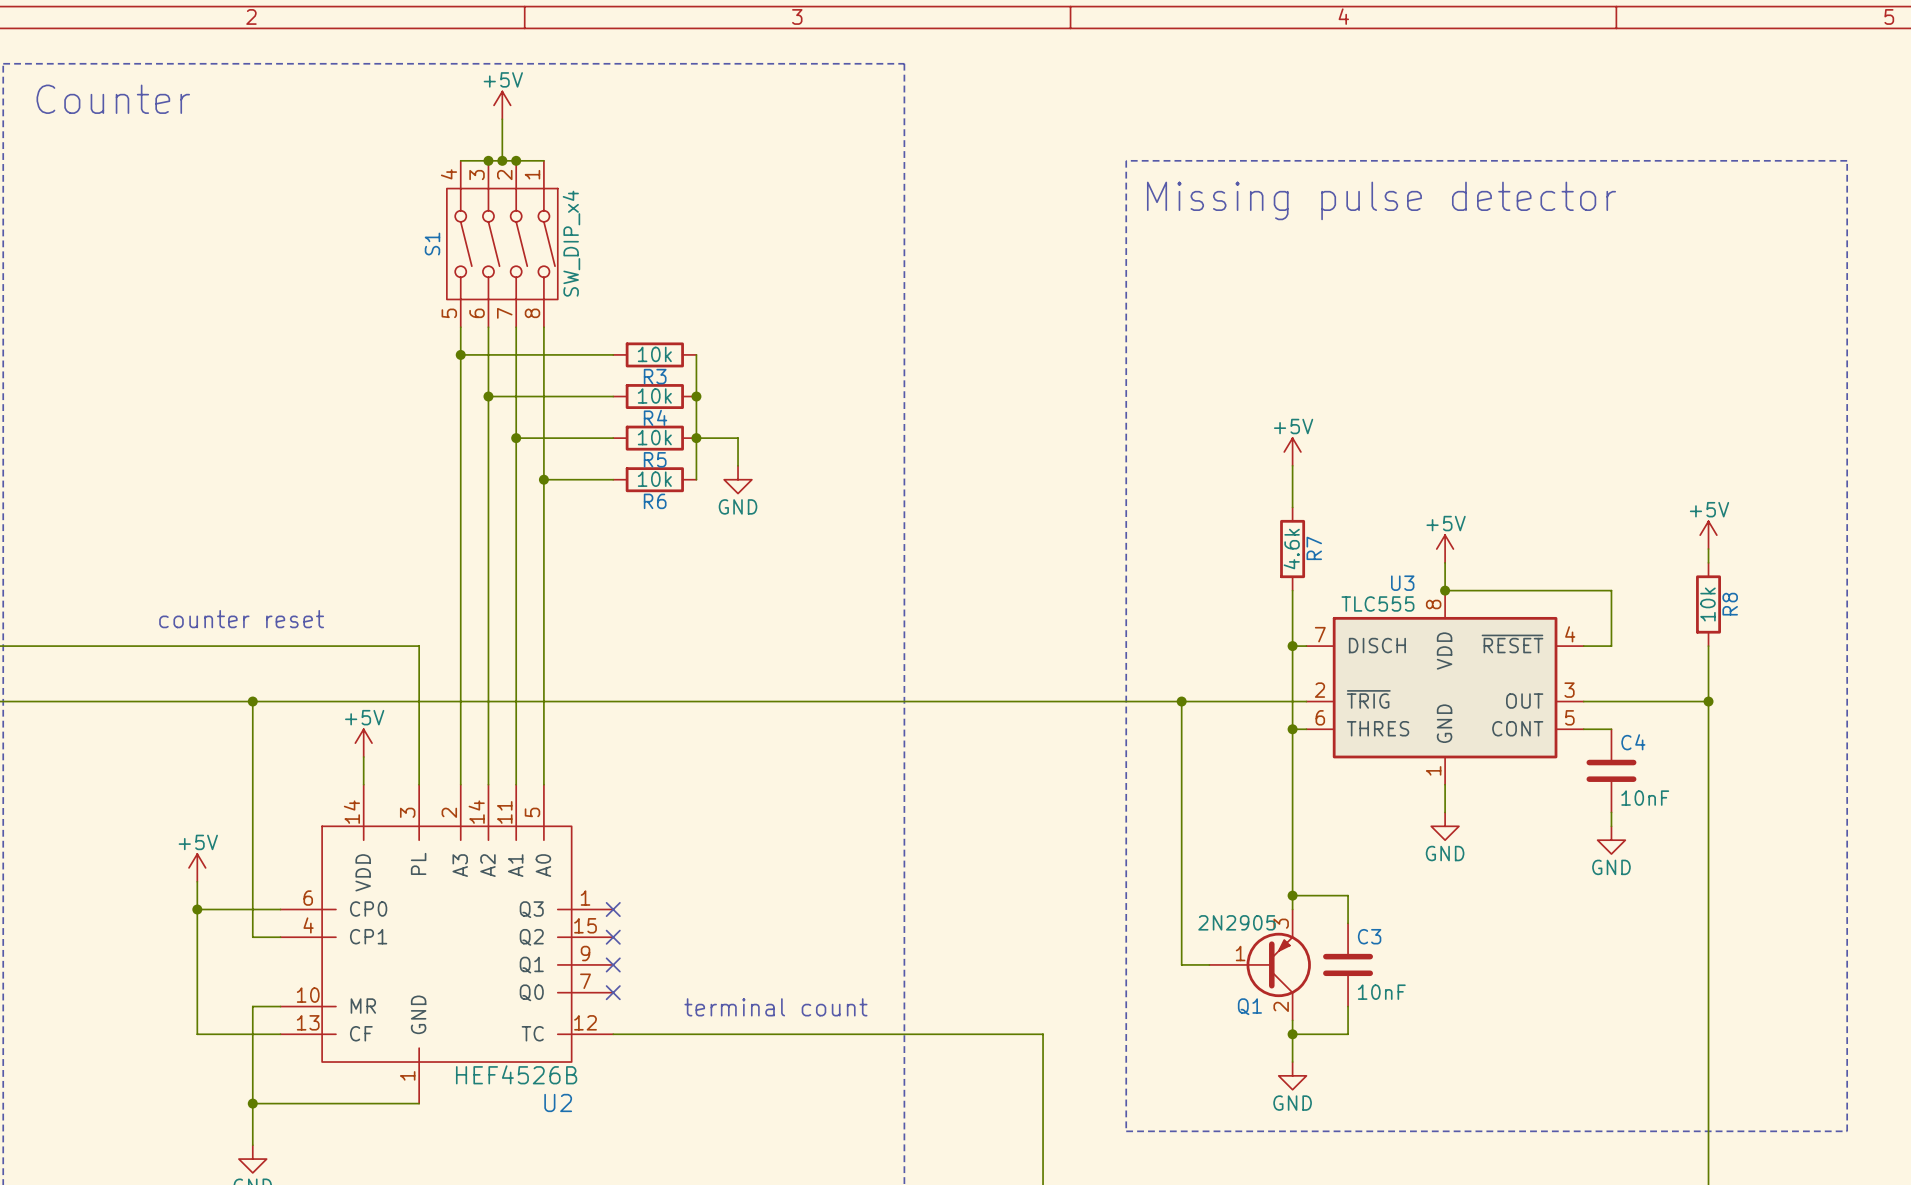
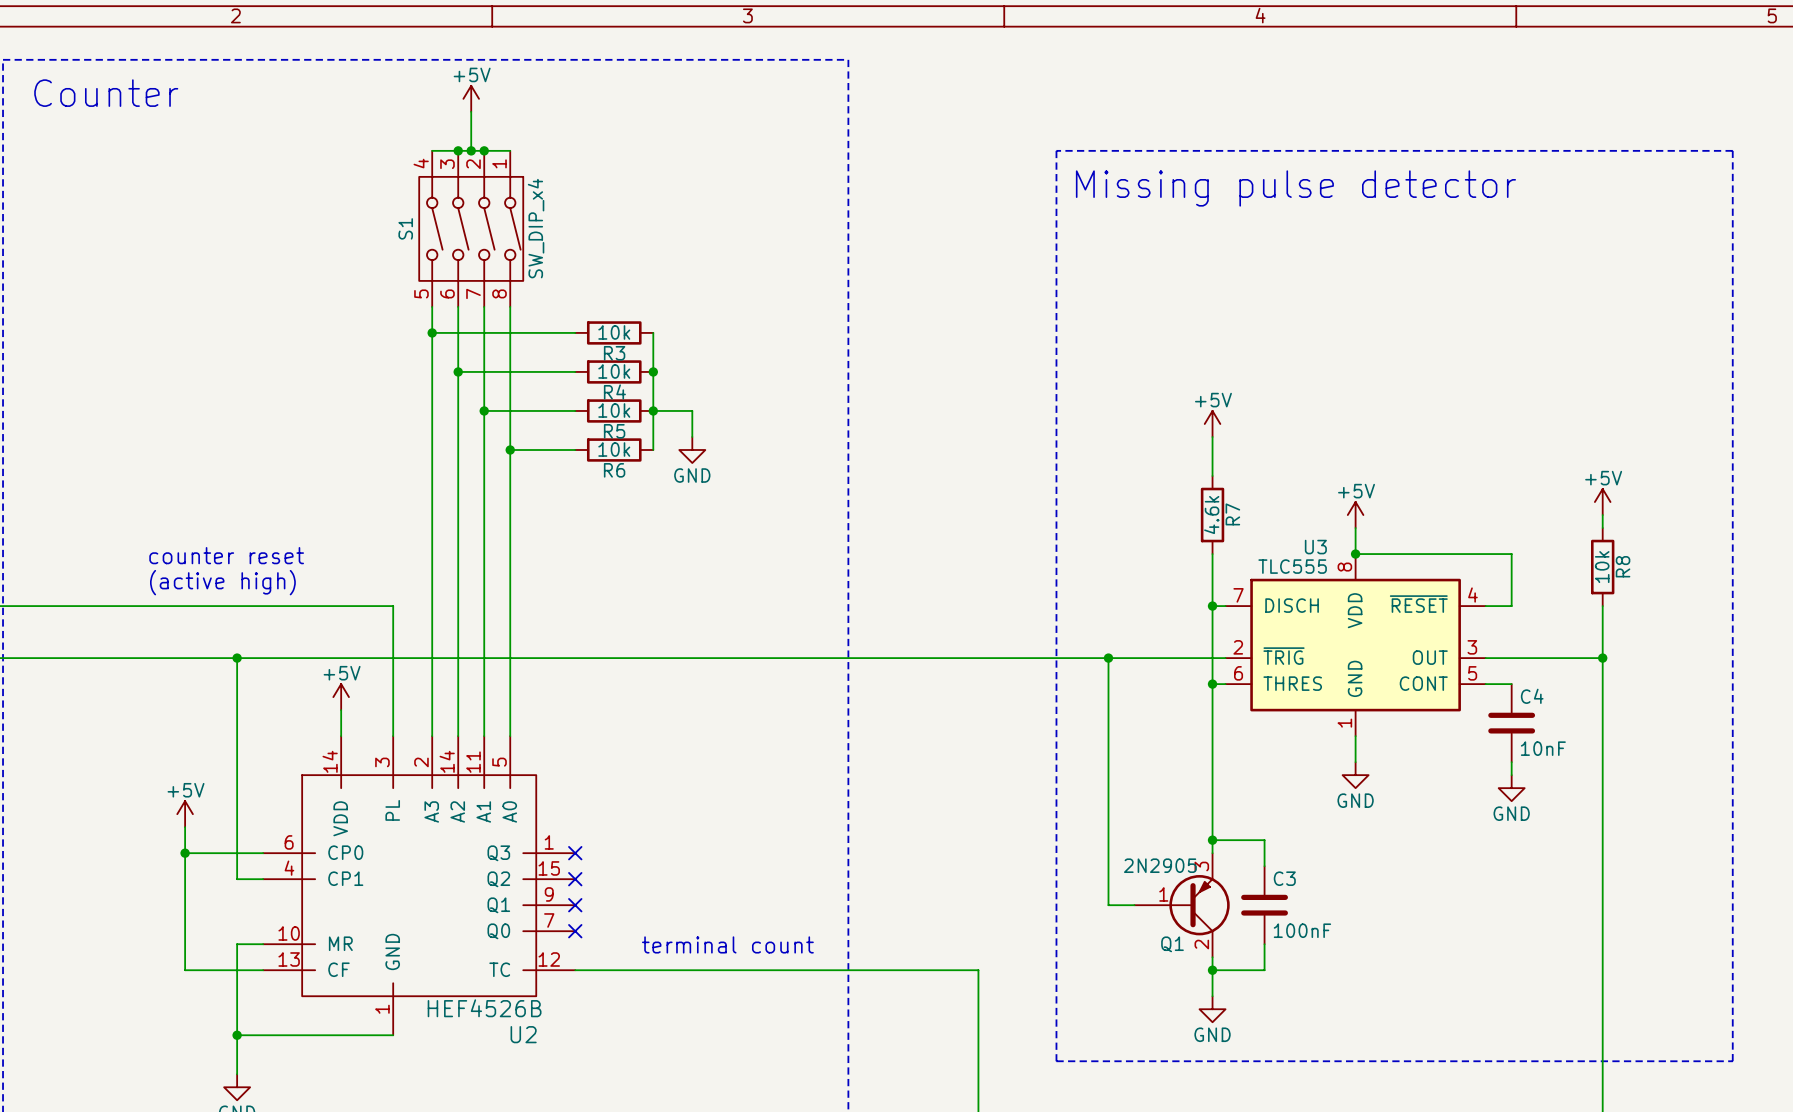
text: none -> counter reset (226, 555)
text: counter reset (241, 619) -> (active high) (222, 582)
C3 value: 10nF (1381, 992) -> 100nF (1302, 930)

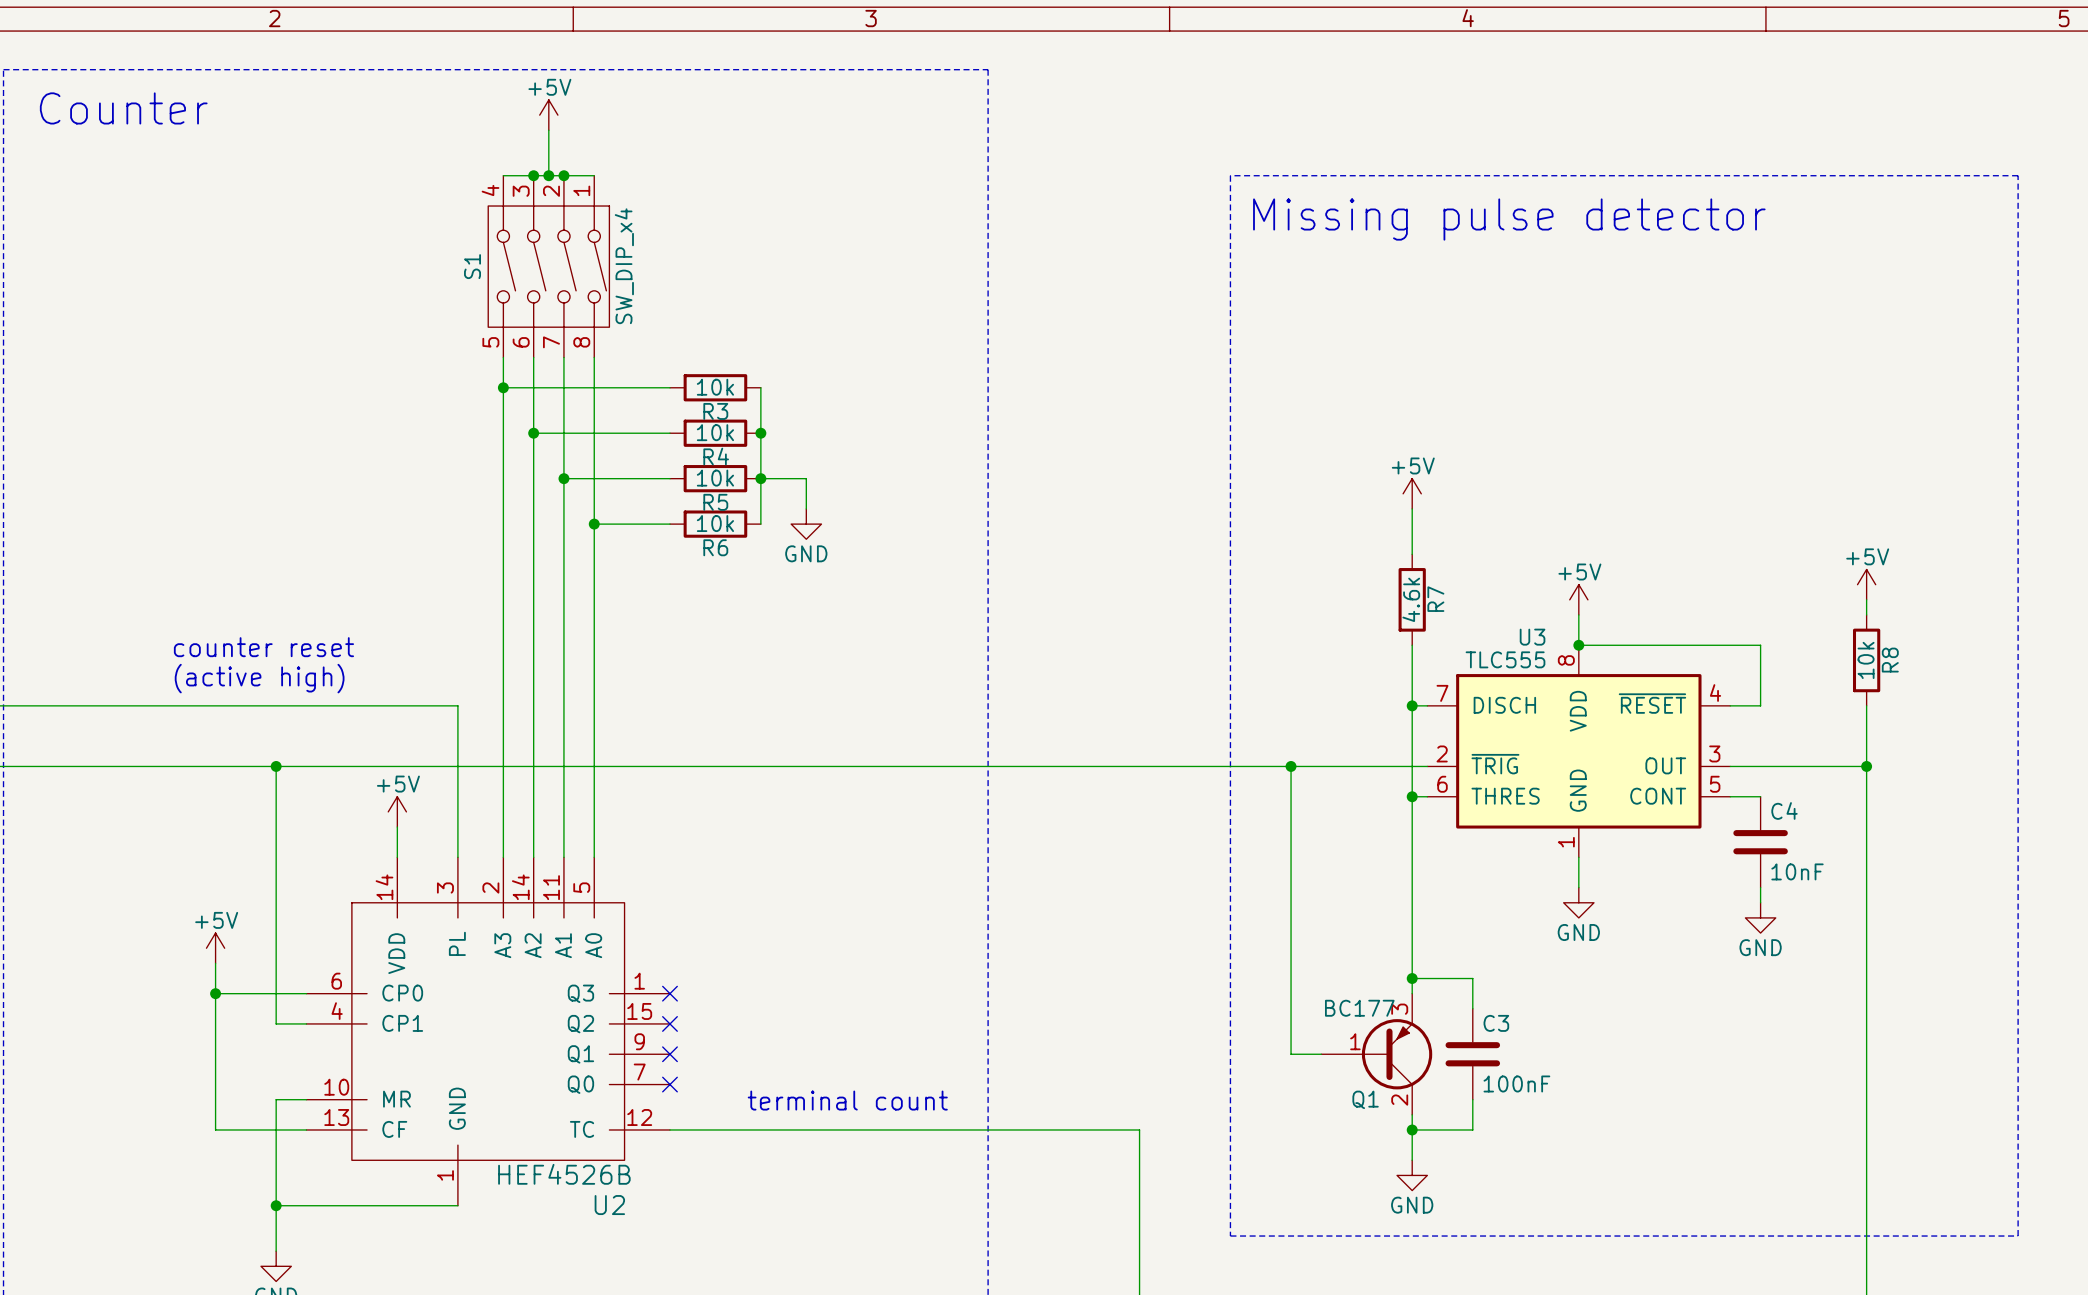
Q1 value: 2N2905 (1160, 865) -> BC177 (1359, 1008)

